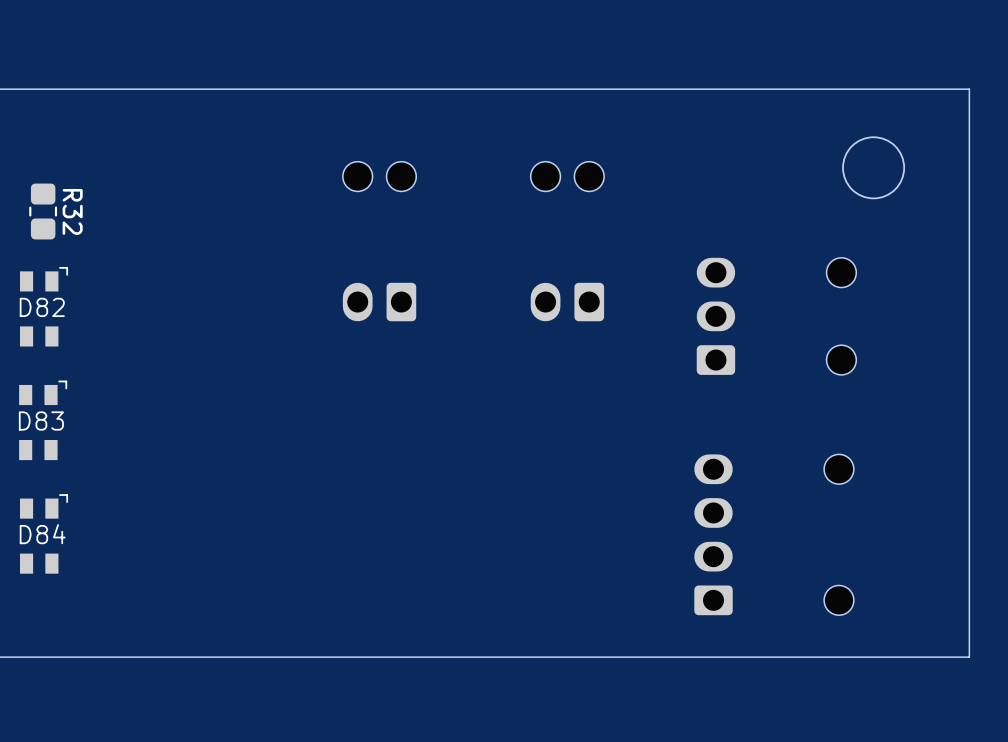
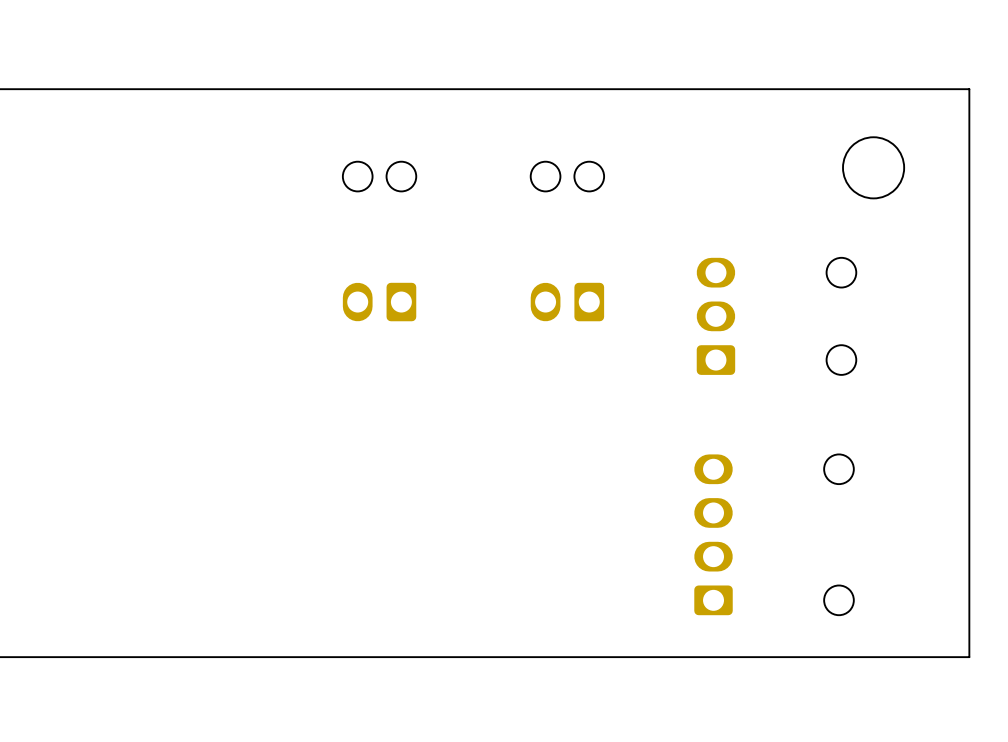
R32: (43, 211) -> none
D82: (44, 306) -> none
D83: (43, 420) -> none
D84: (44, 533) -> none

